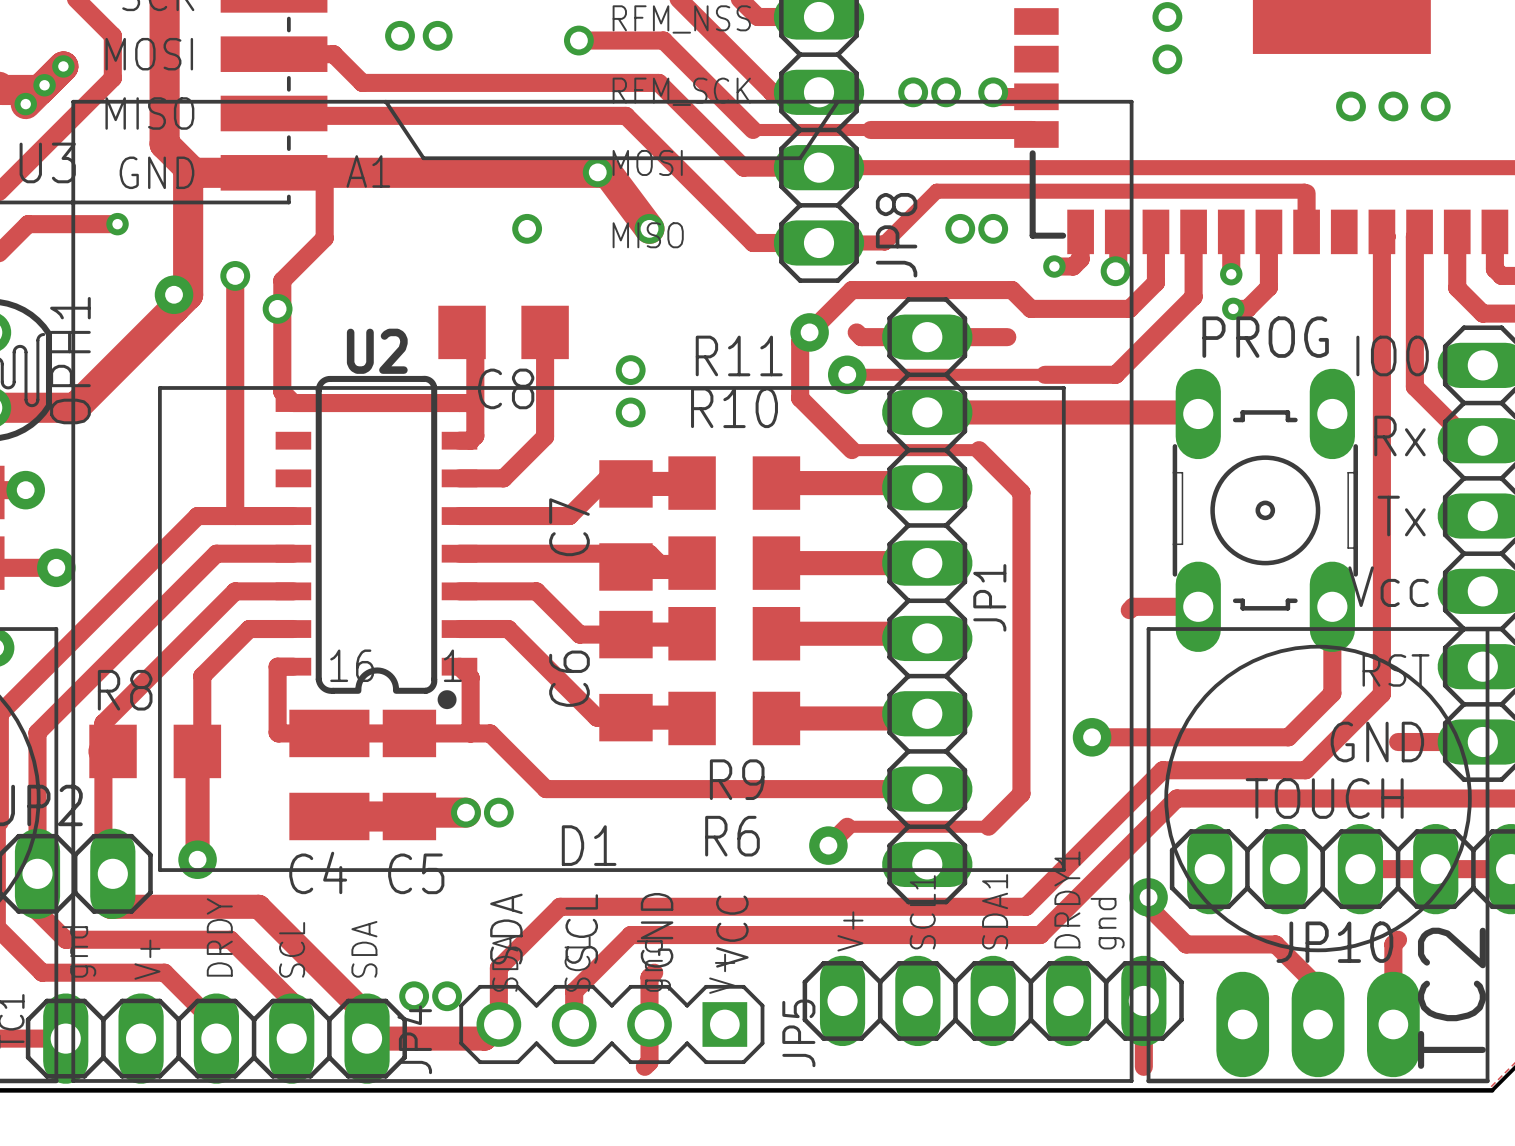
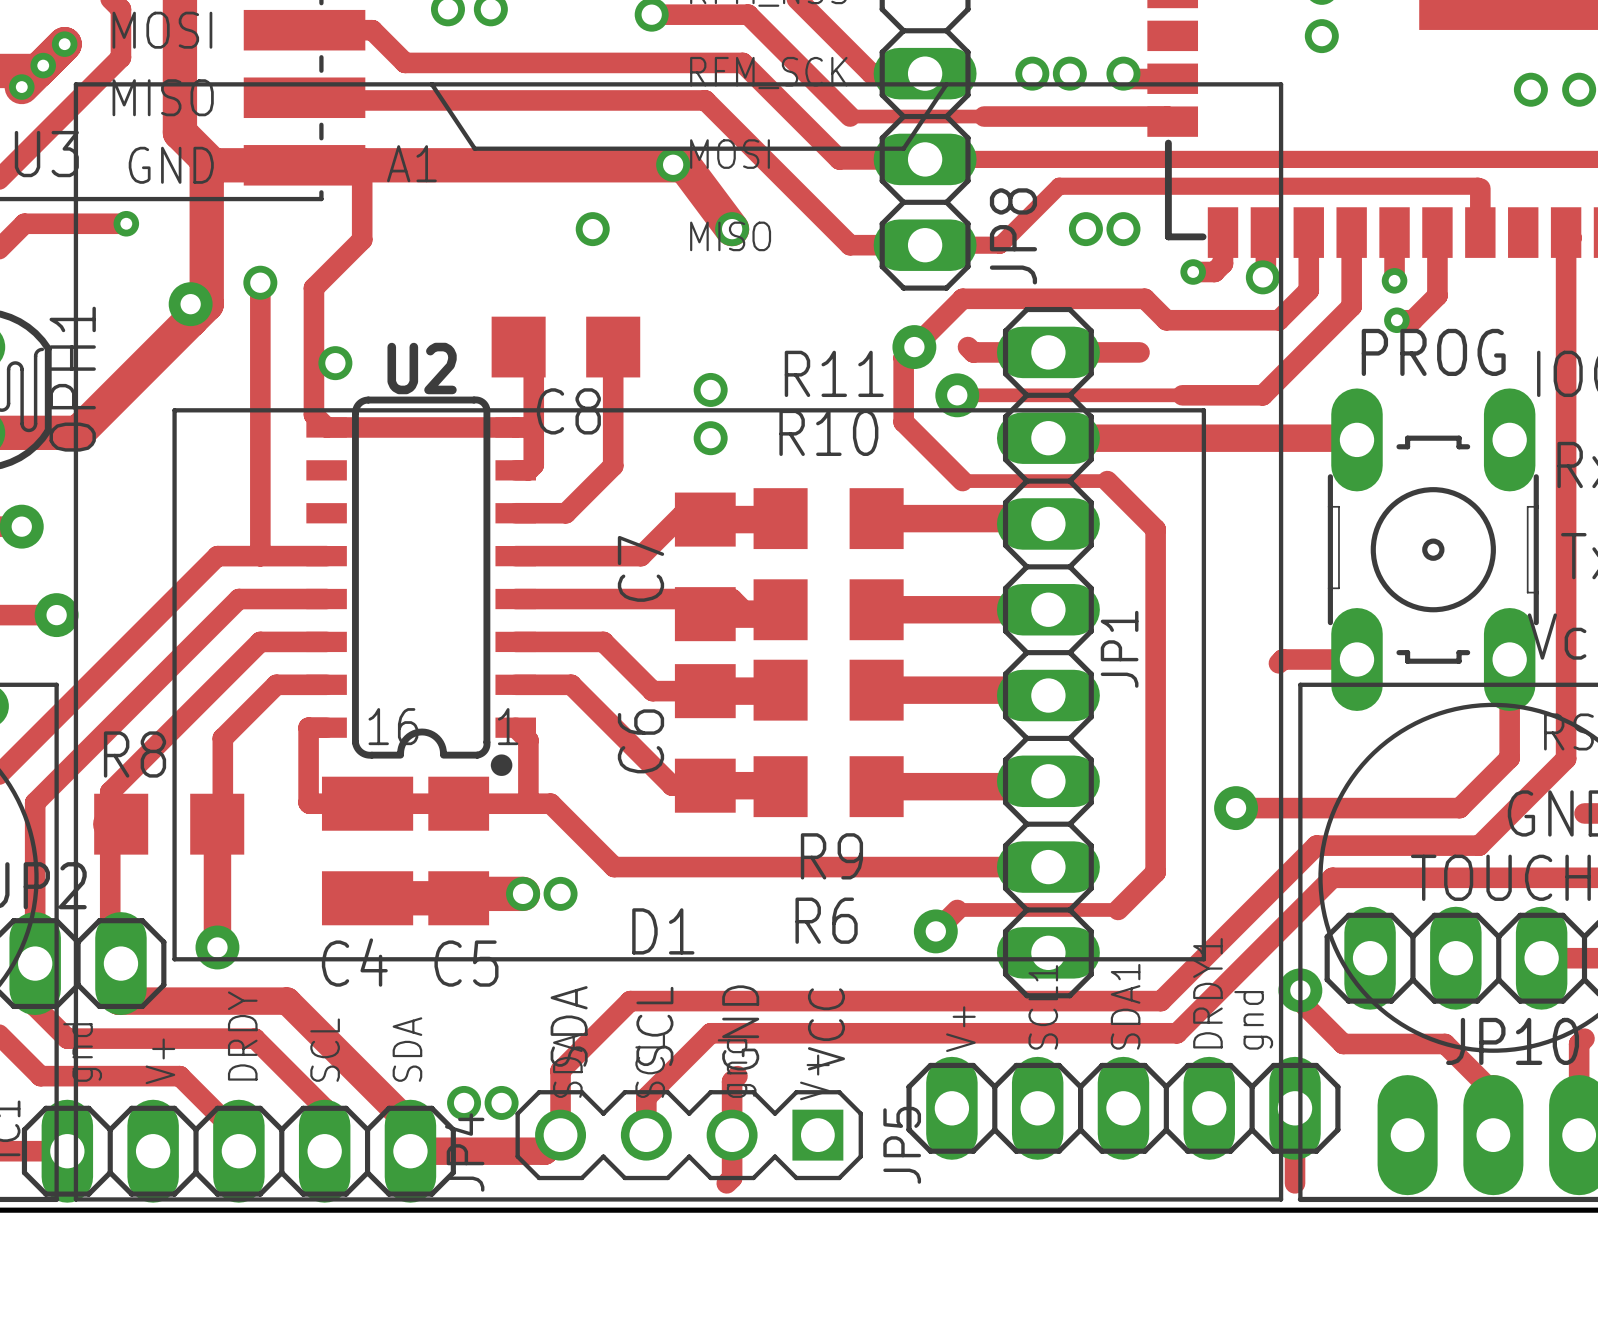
via position: (277, 308) -> (335, 363)

